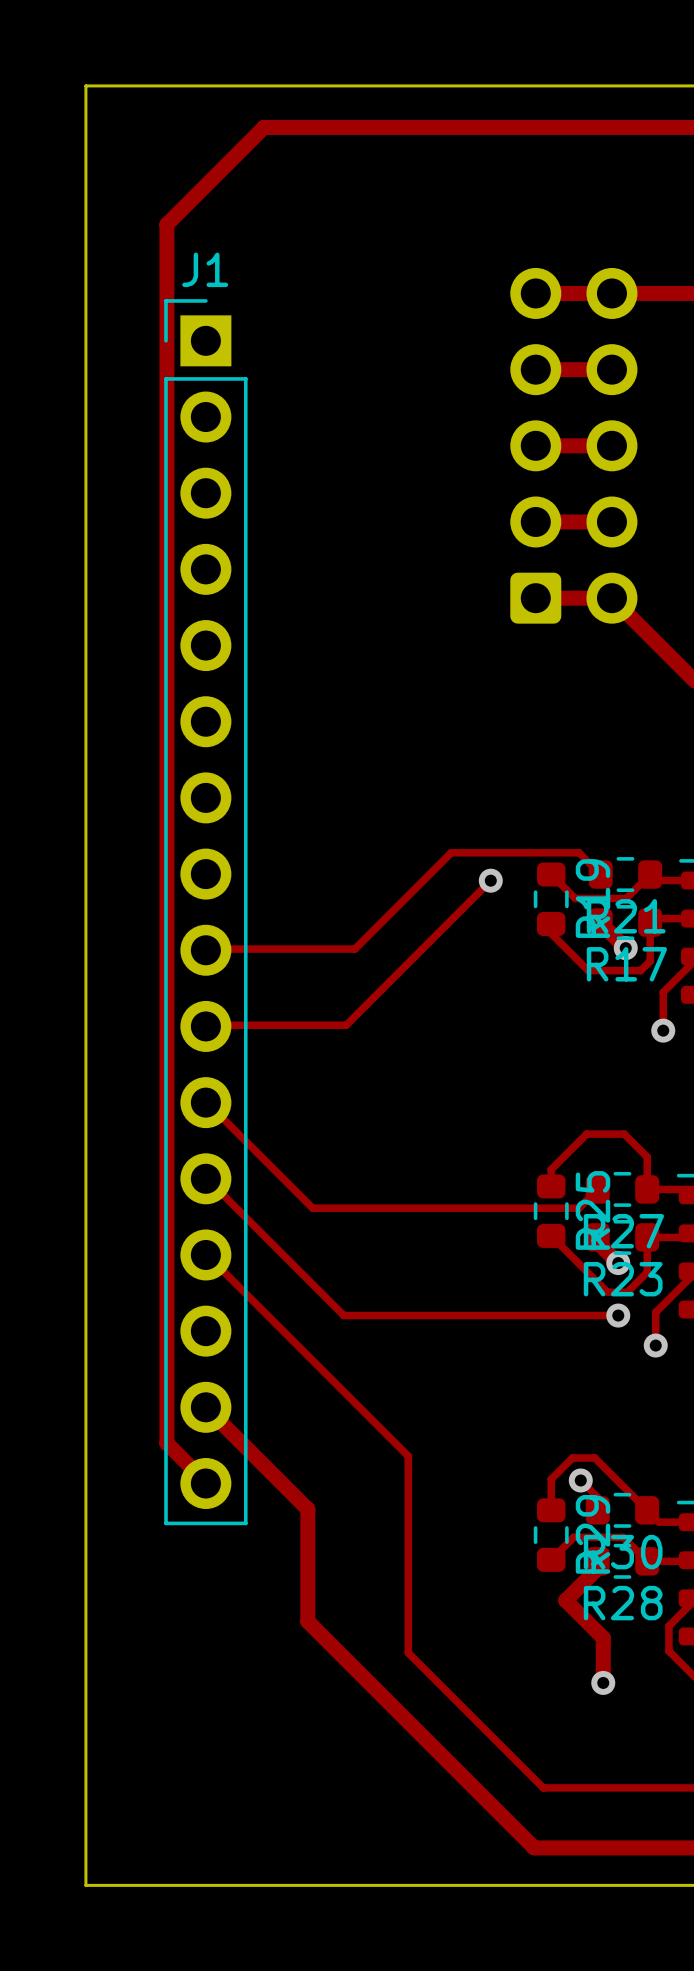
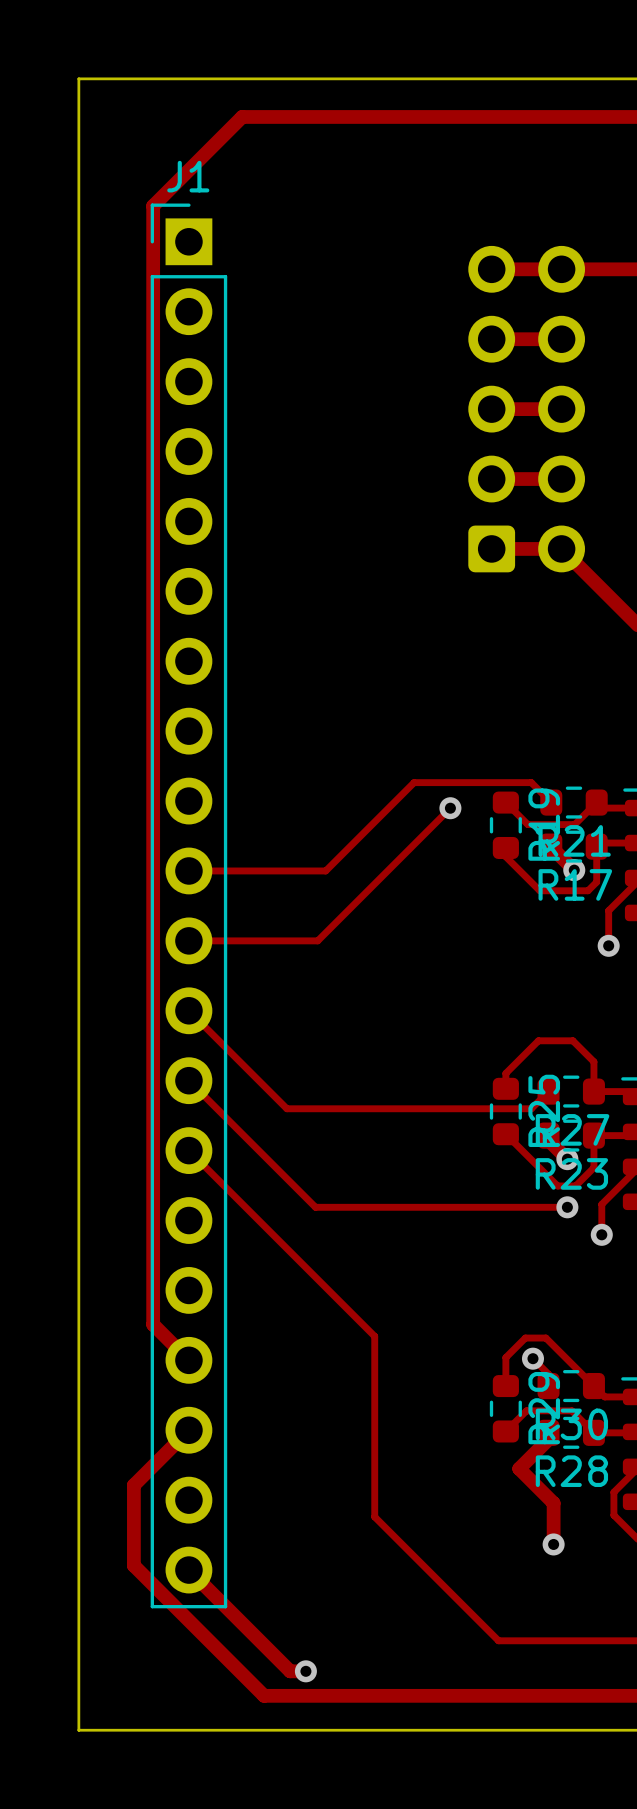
J1 name position: J1 (205, 269) -> J1 (188, 176)
J1 footprint: [164, 299, 248, 1526] -> [150, 203, 228, 1609]
track: (205, 1407) (307, 1509) (307, 1621) (534, 1847) -> (188, 1430) (133, 1485) (133, 1565) (264, 1695) (490, 1695)
track: none -> (188, 1570) (290, 1671) (305, 1671)
via: none -> (305, 1671)

